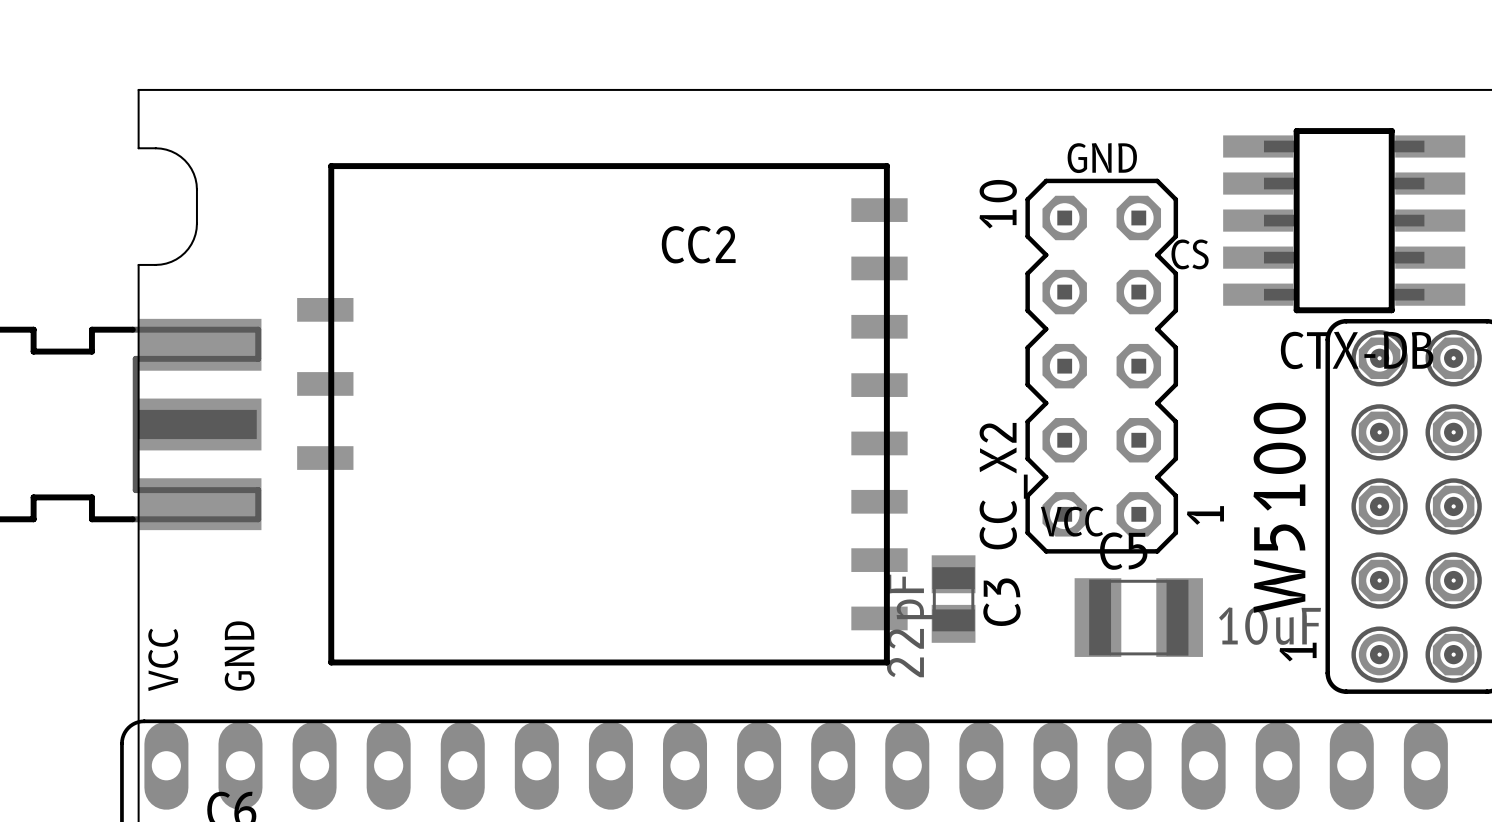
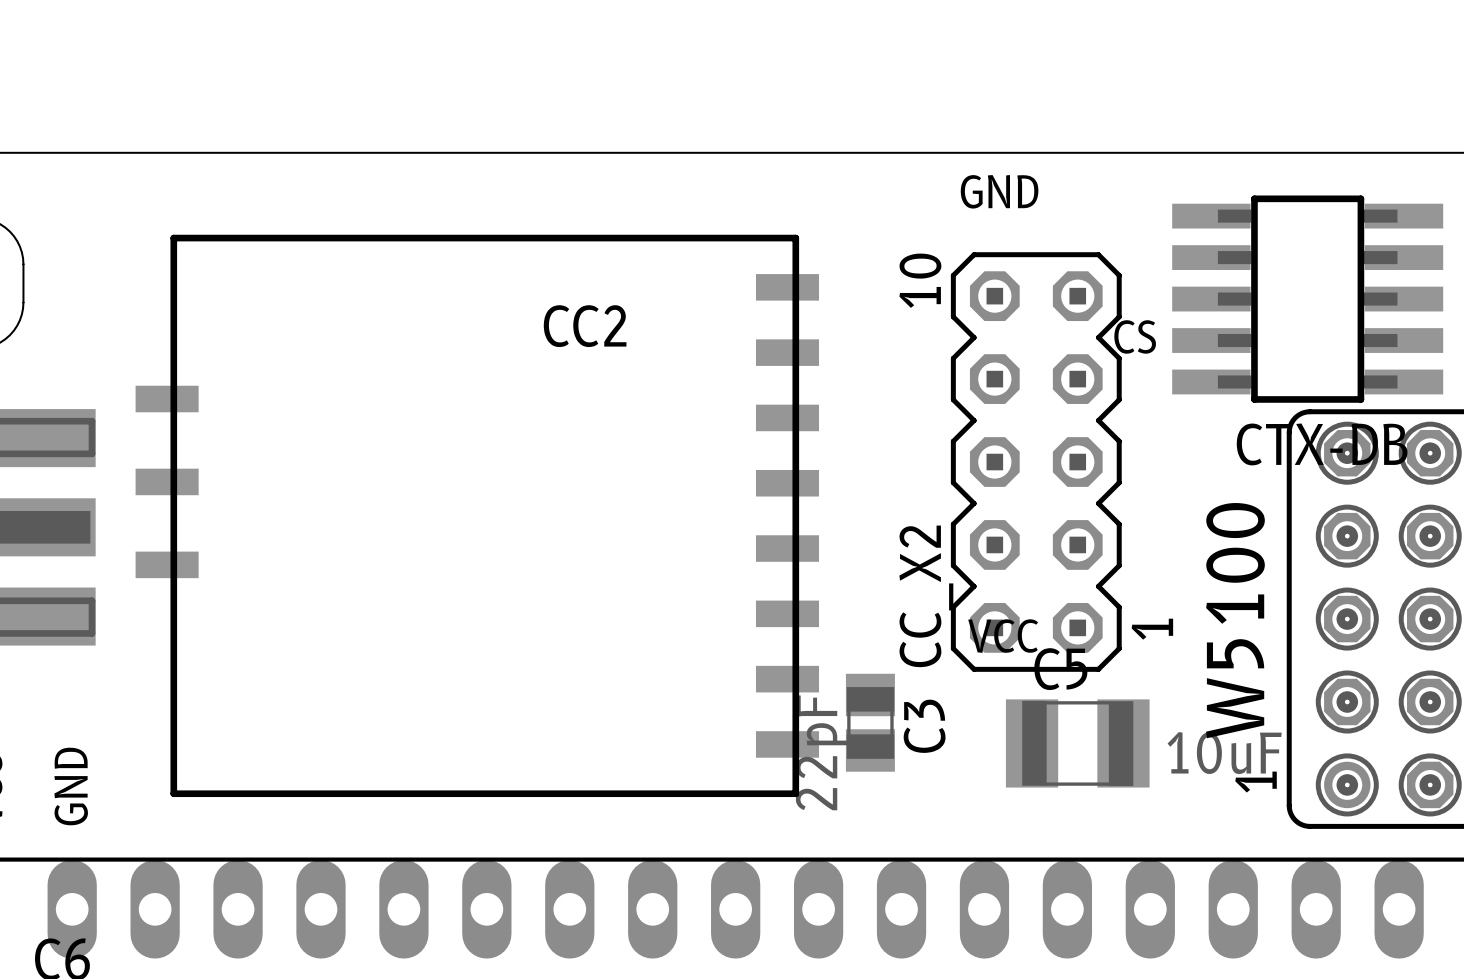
text position: GND (1102, 158) -> GND (999, 191)

